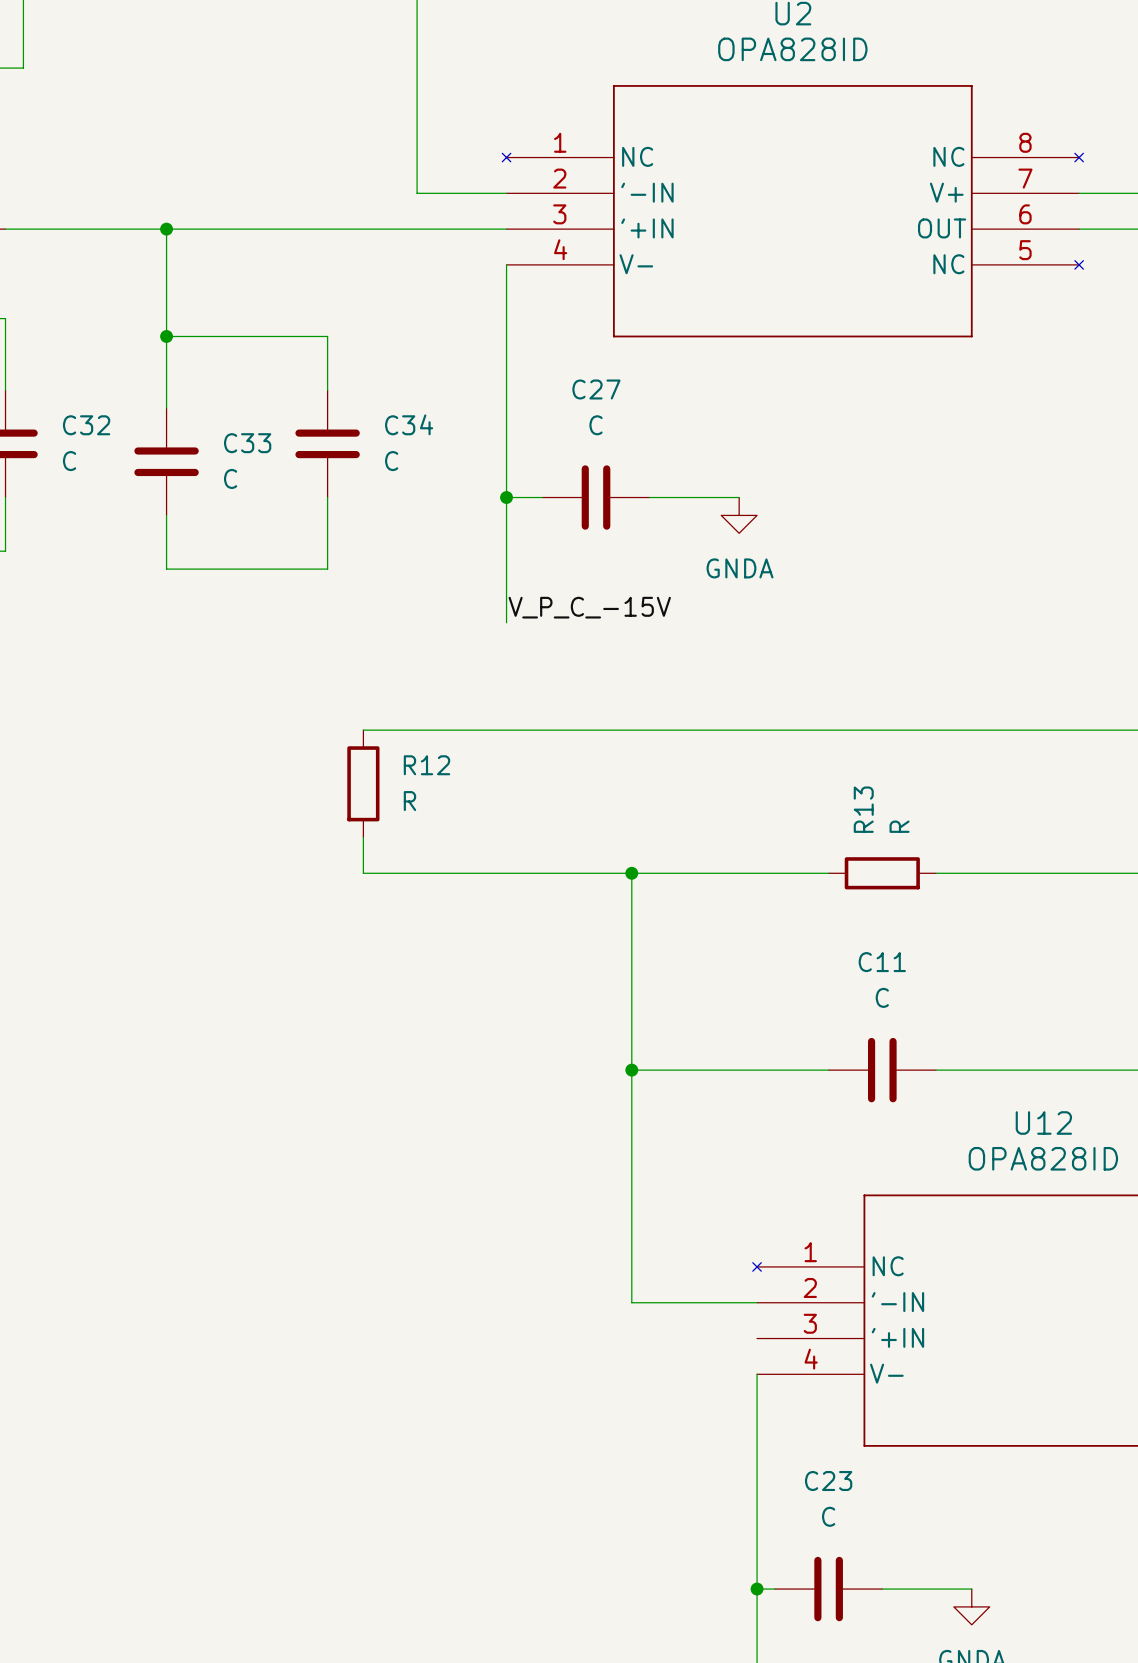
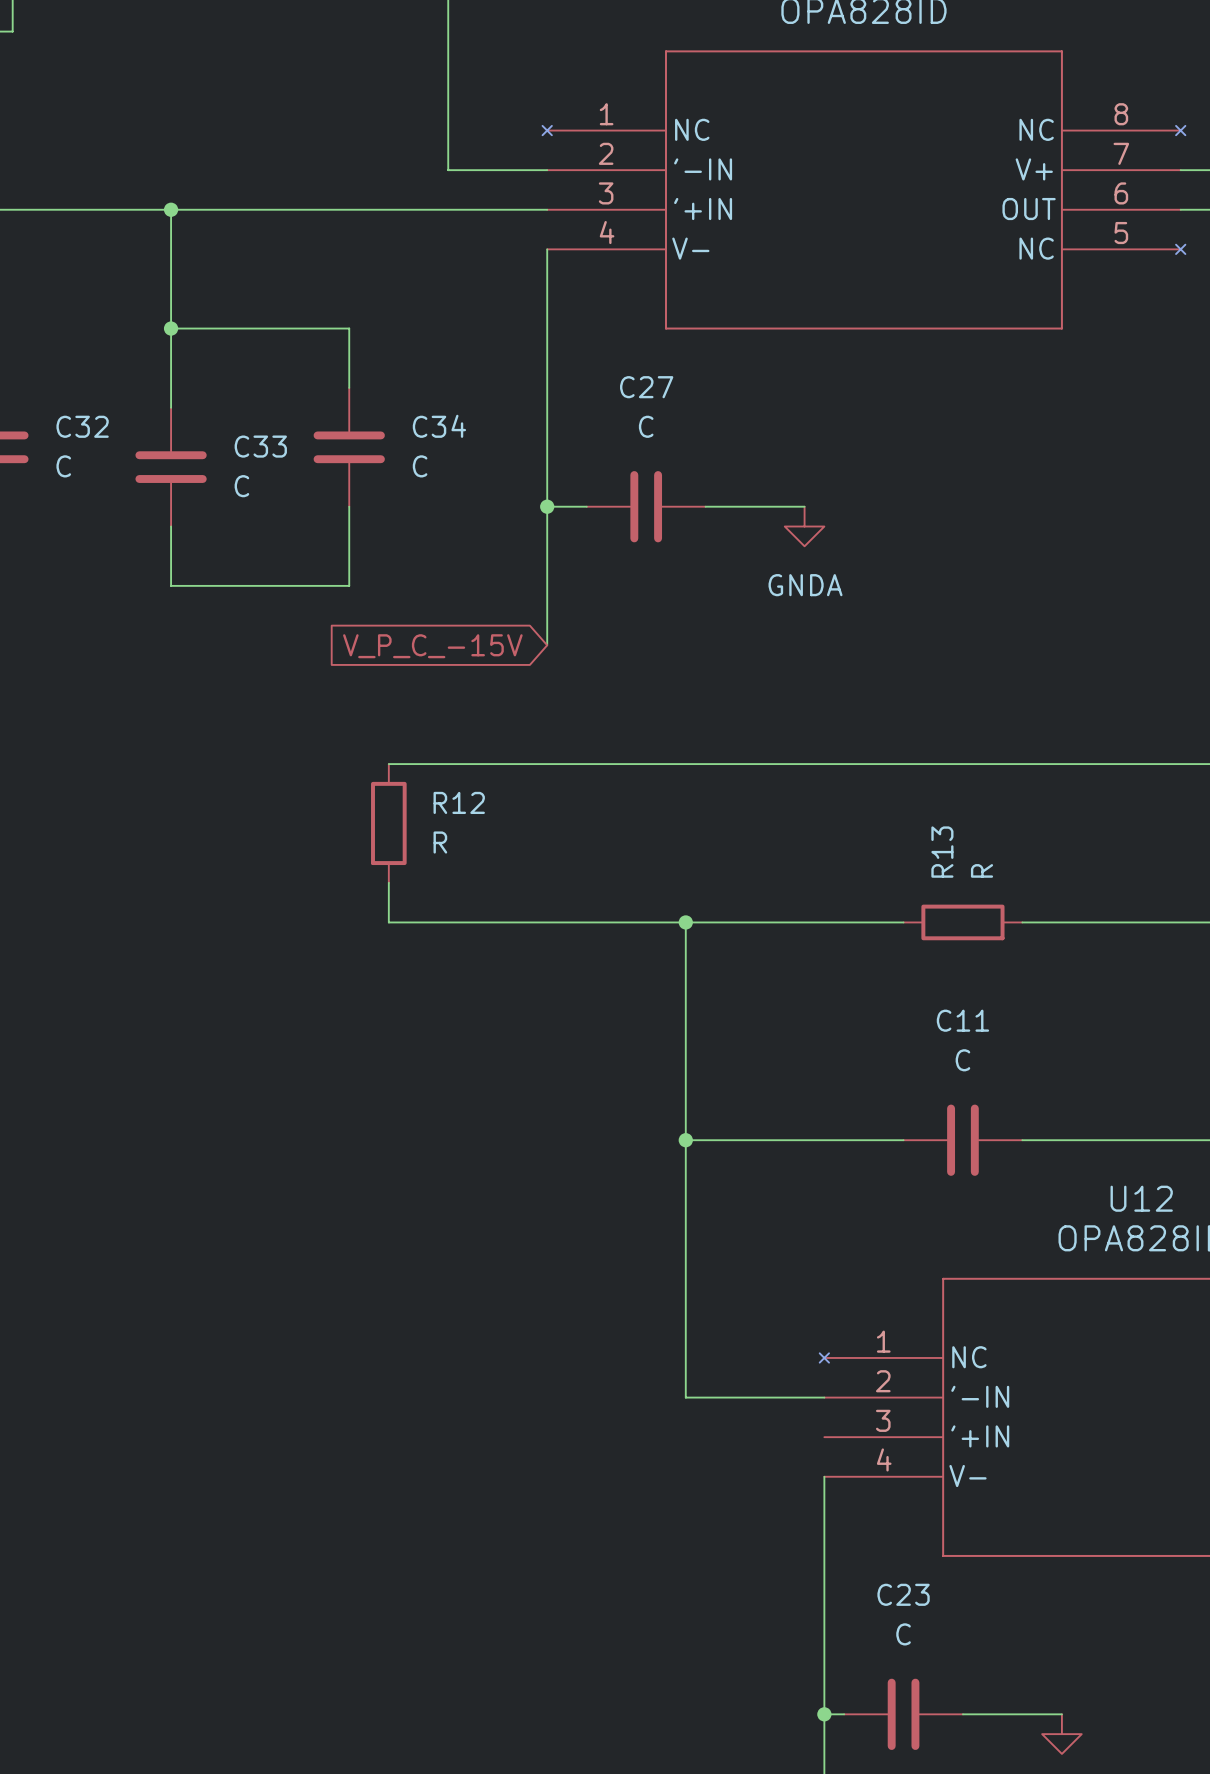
label: V_P_C_-15V (589, 607) -> none
global label: none -> V_P_C_-15V (432, 646)

